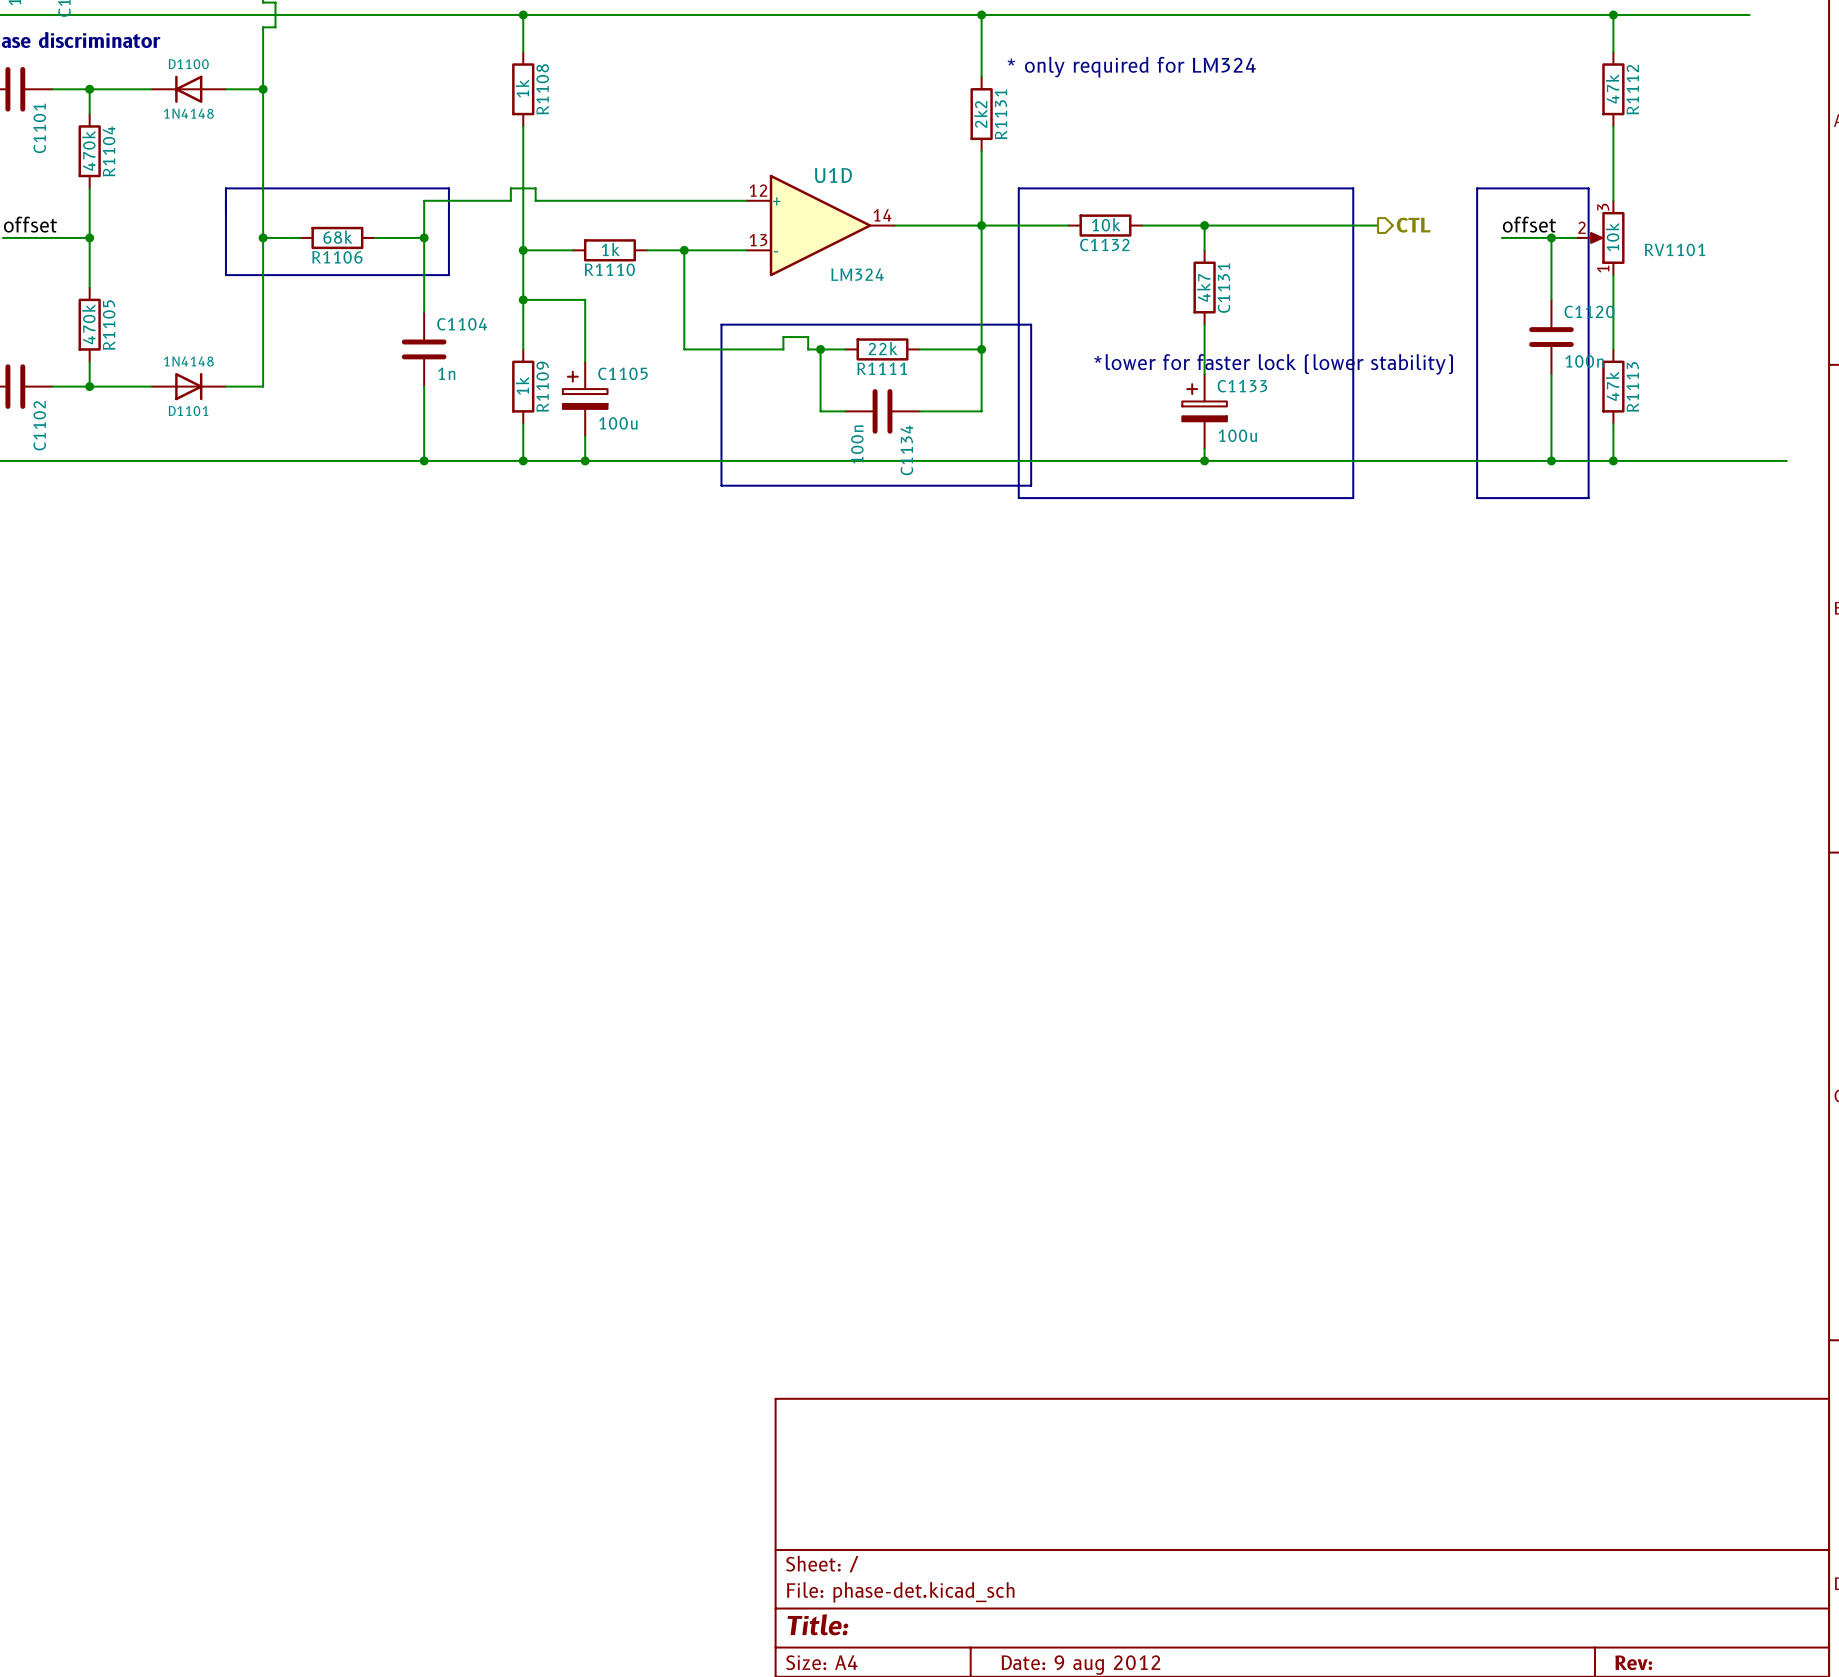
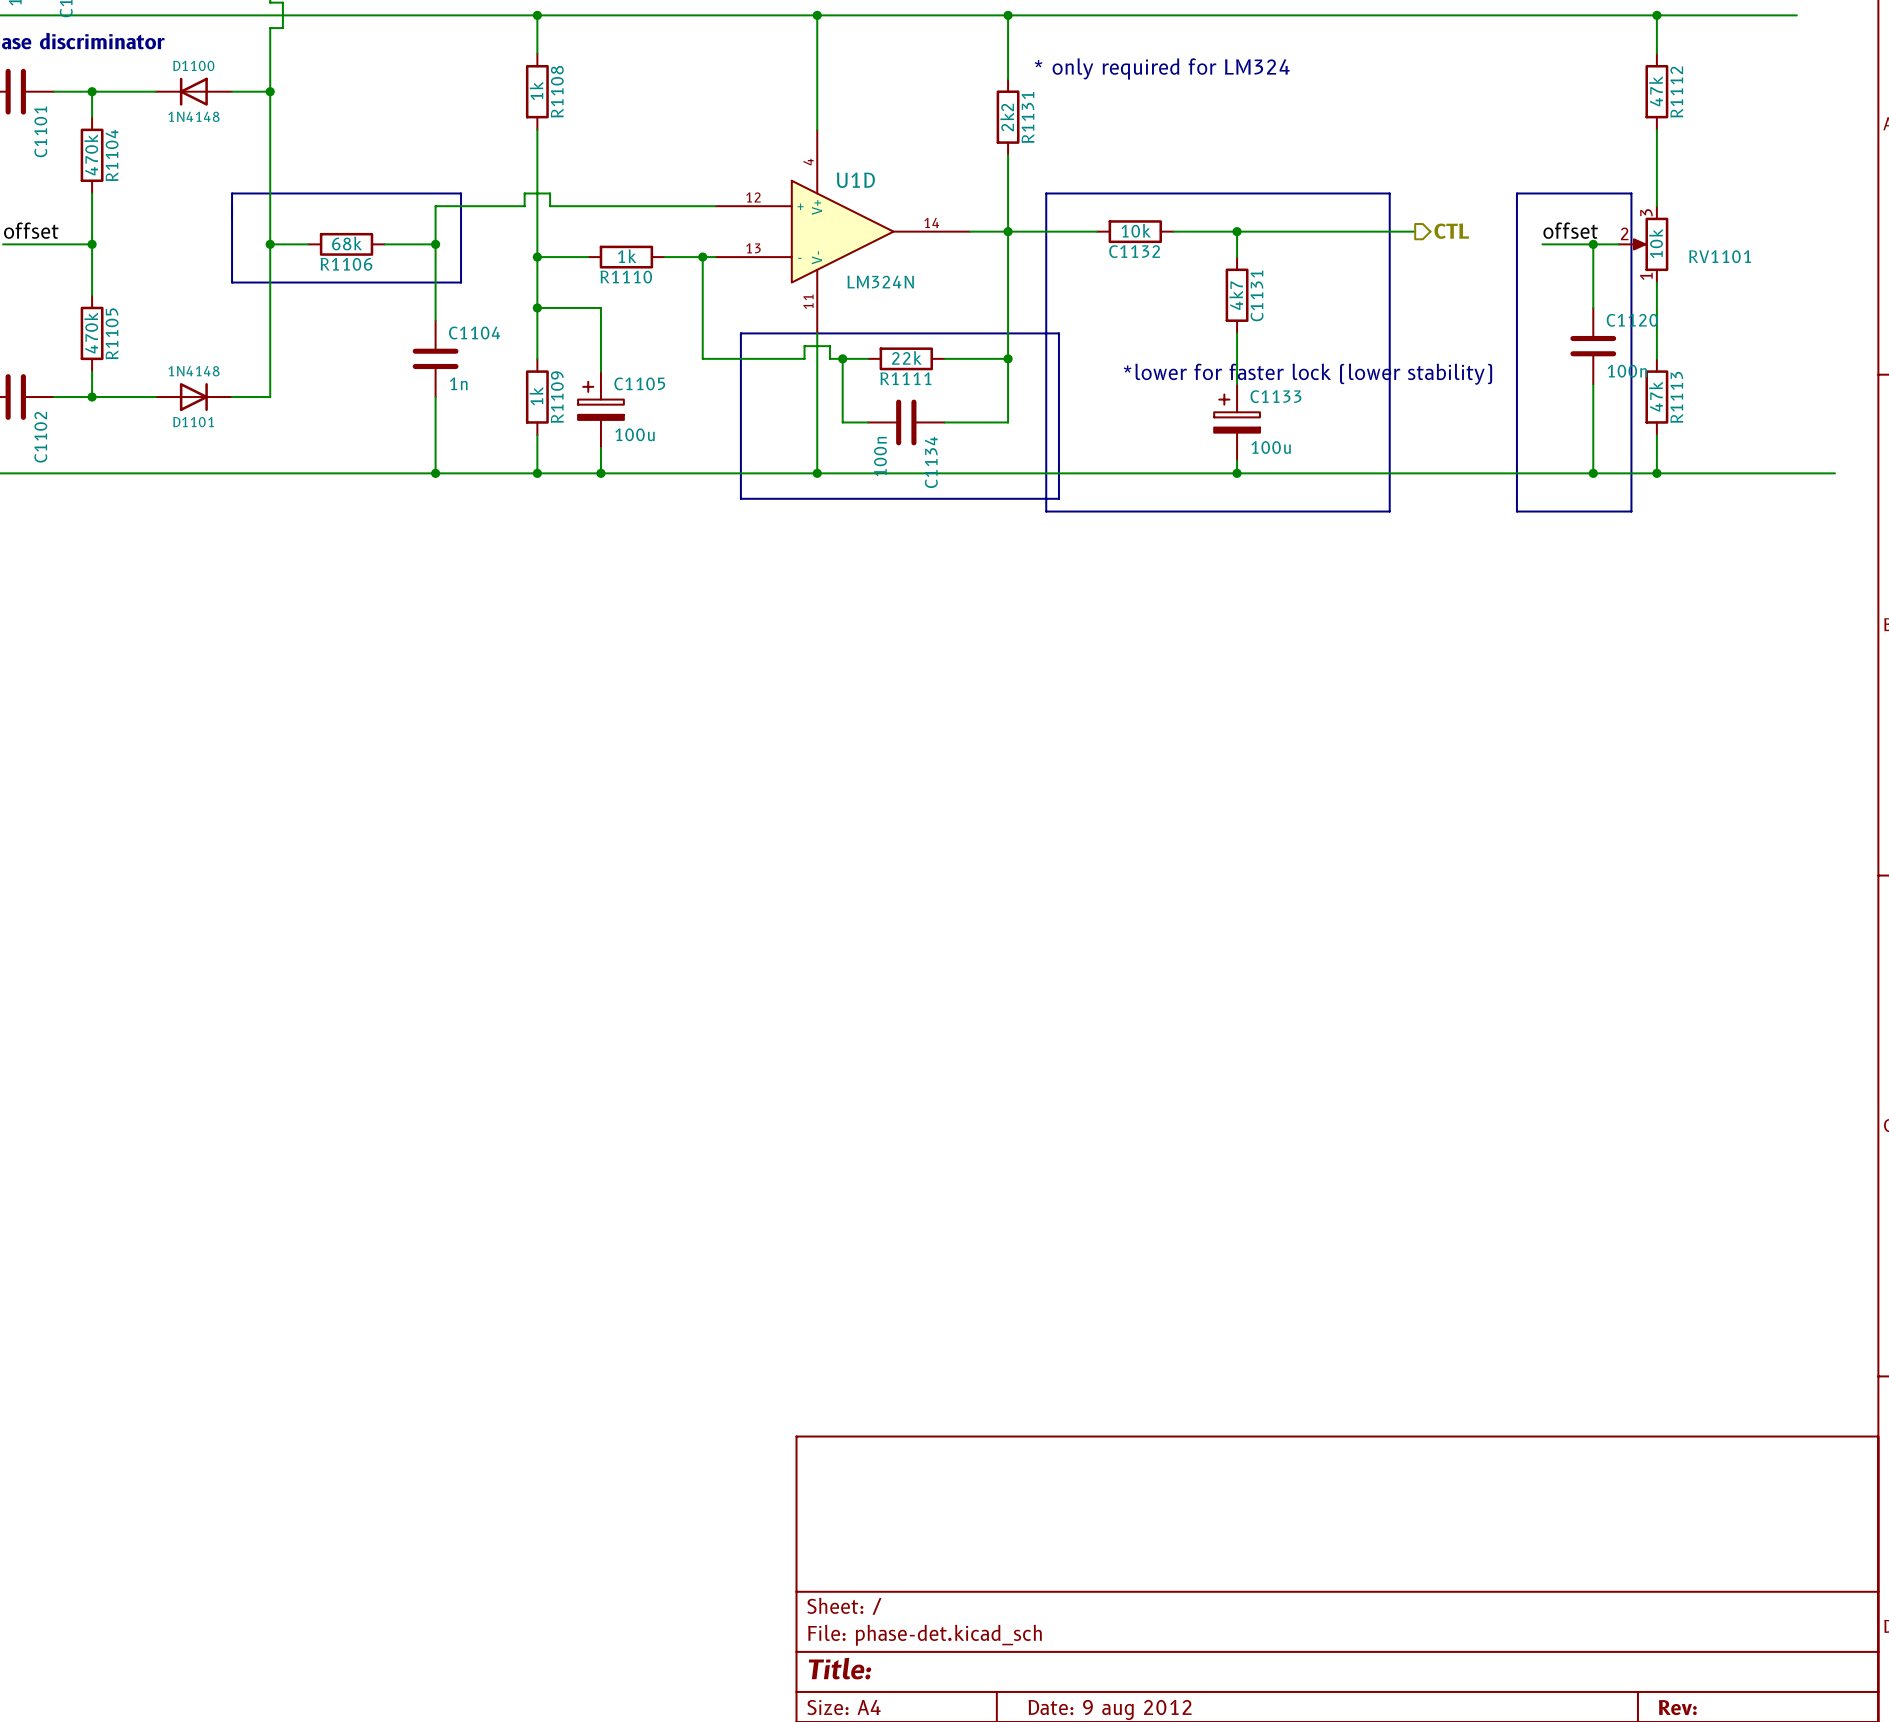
wire: none -> (817, 15) (817, 129)
junction: none -> (817, 15)
U1D symbol: [746, 174, 895, 277] -> [715, 129, 970, 334]
U1D value: LM324 (857, 274) -> LM324N (880, 282)
wire: none -> (817, 333) (817, 473)
junction: none -> (817, 473)

